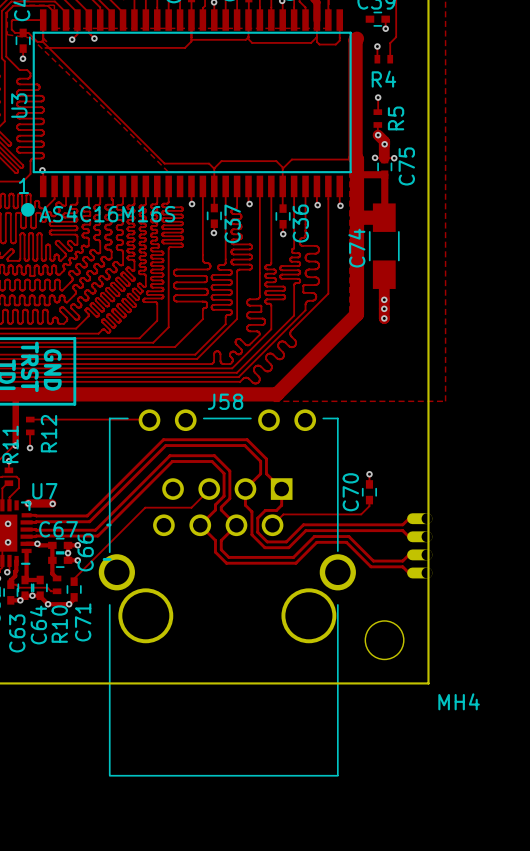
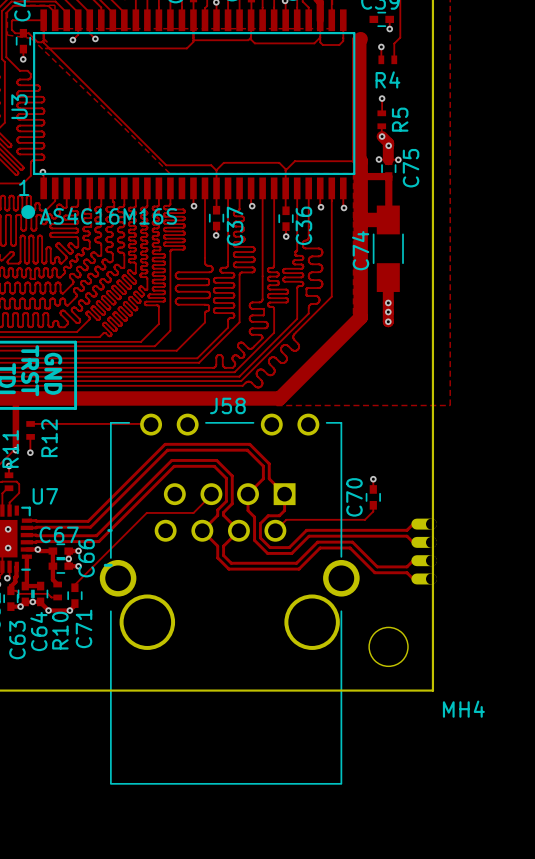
track: (28, 503) (52, 503) -> none
via: (28, 503) -> none
via: (52, 503) -> none

